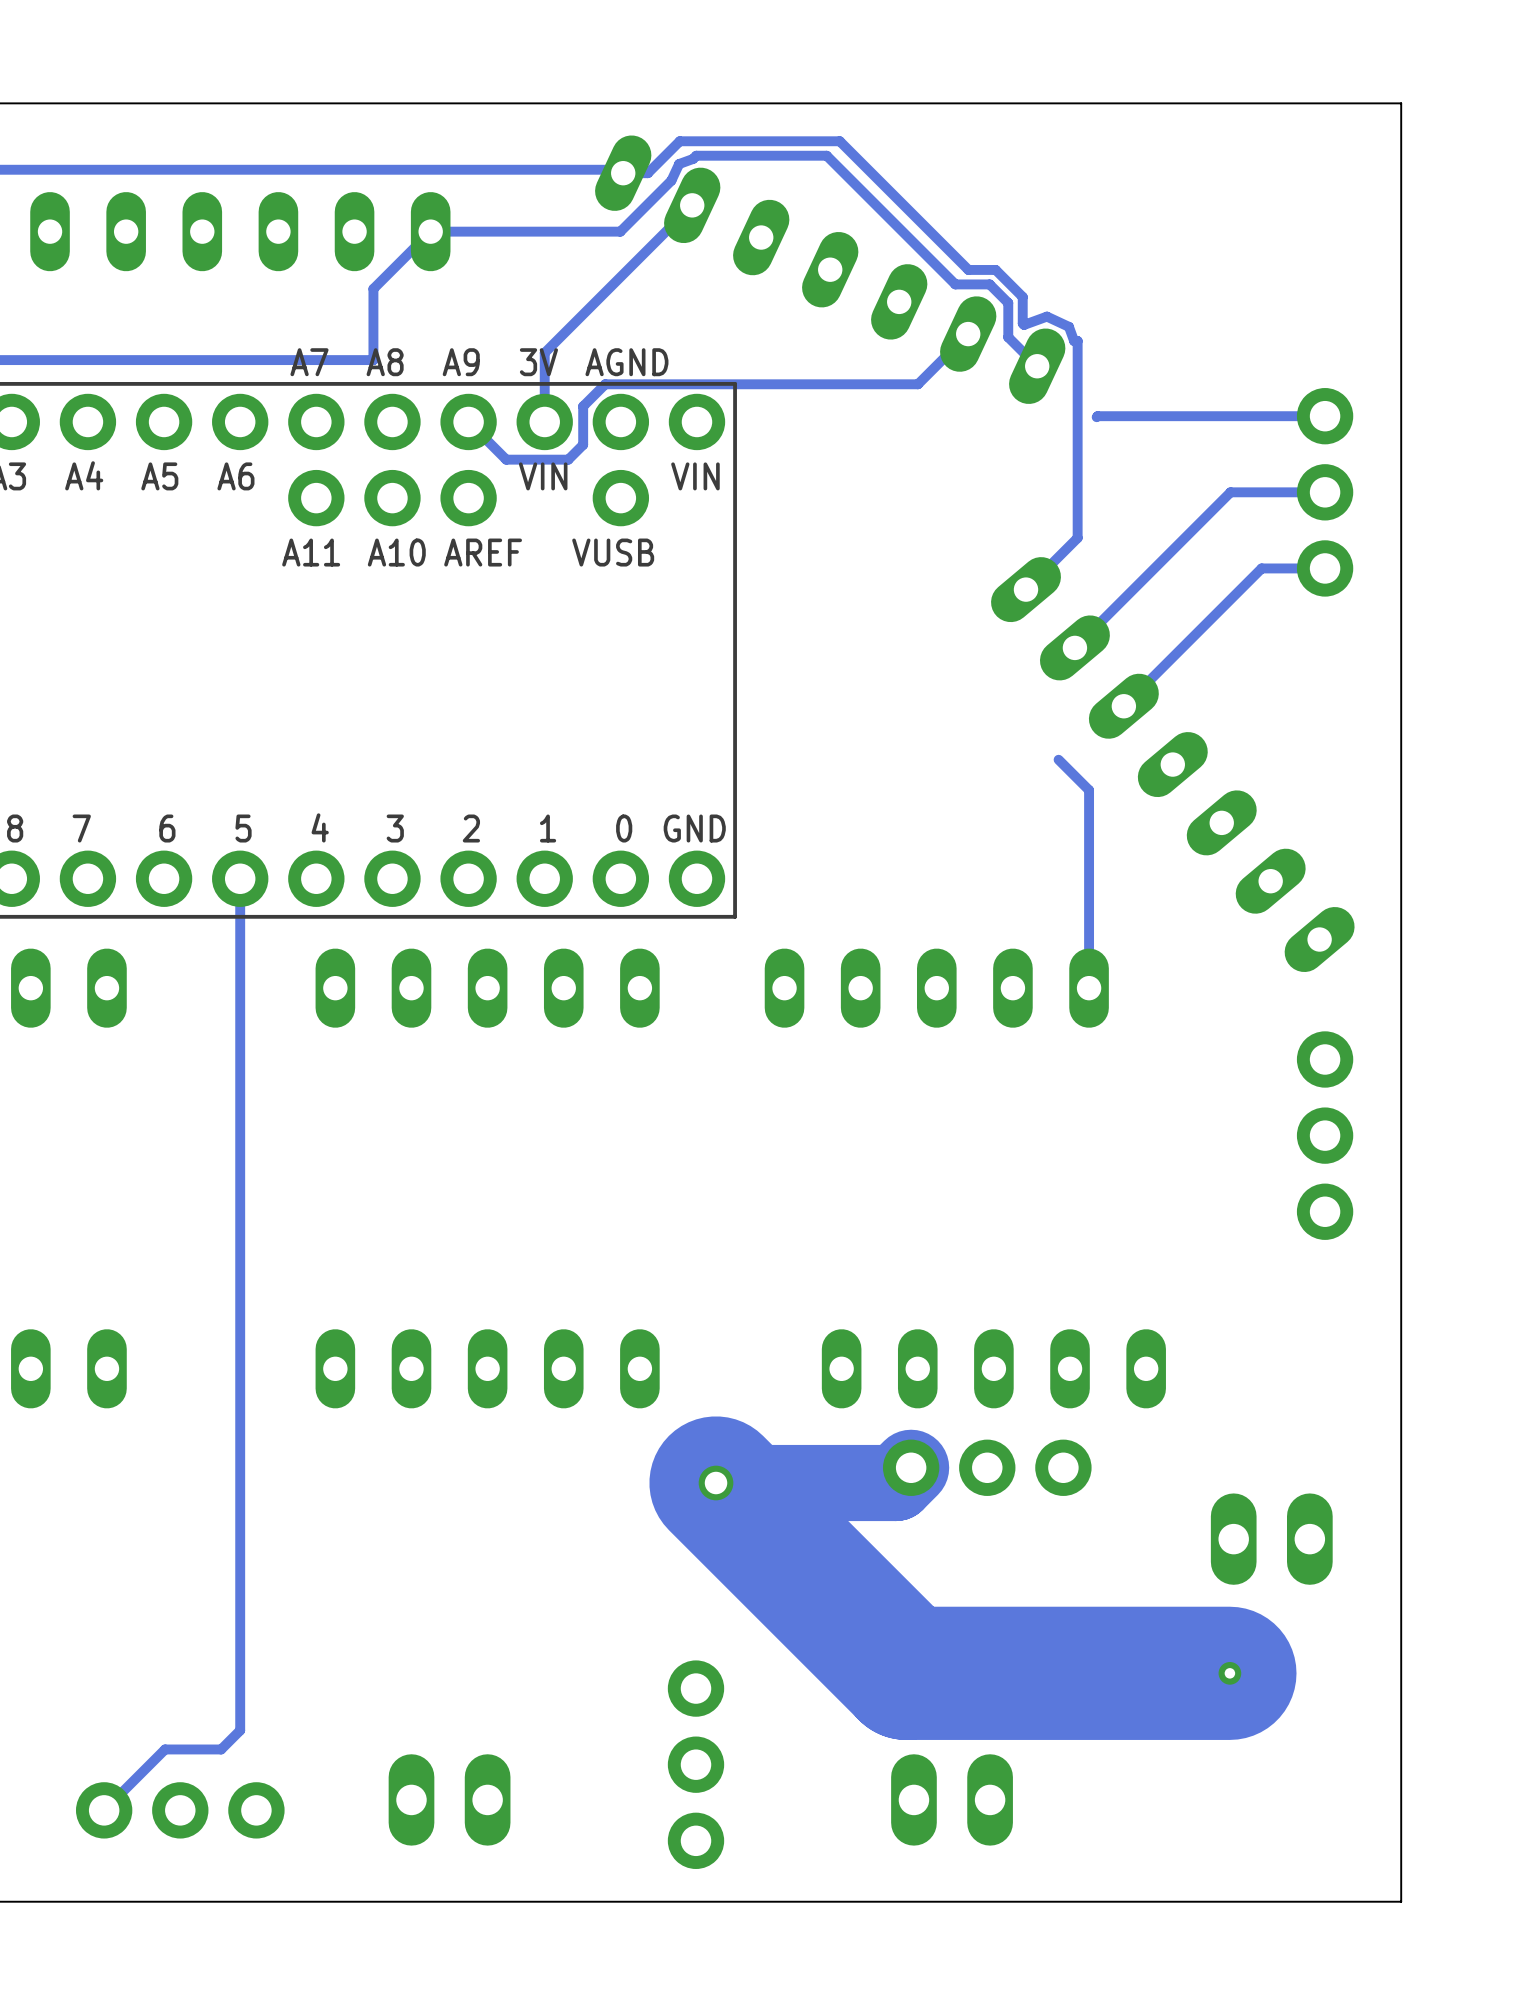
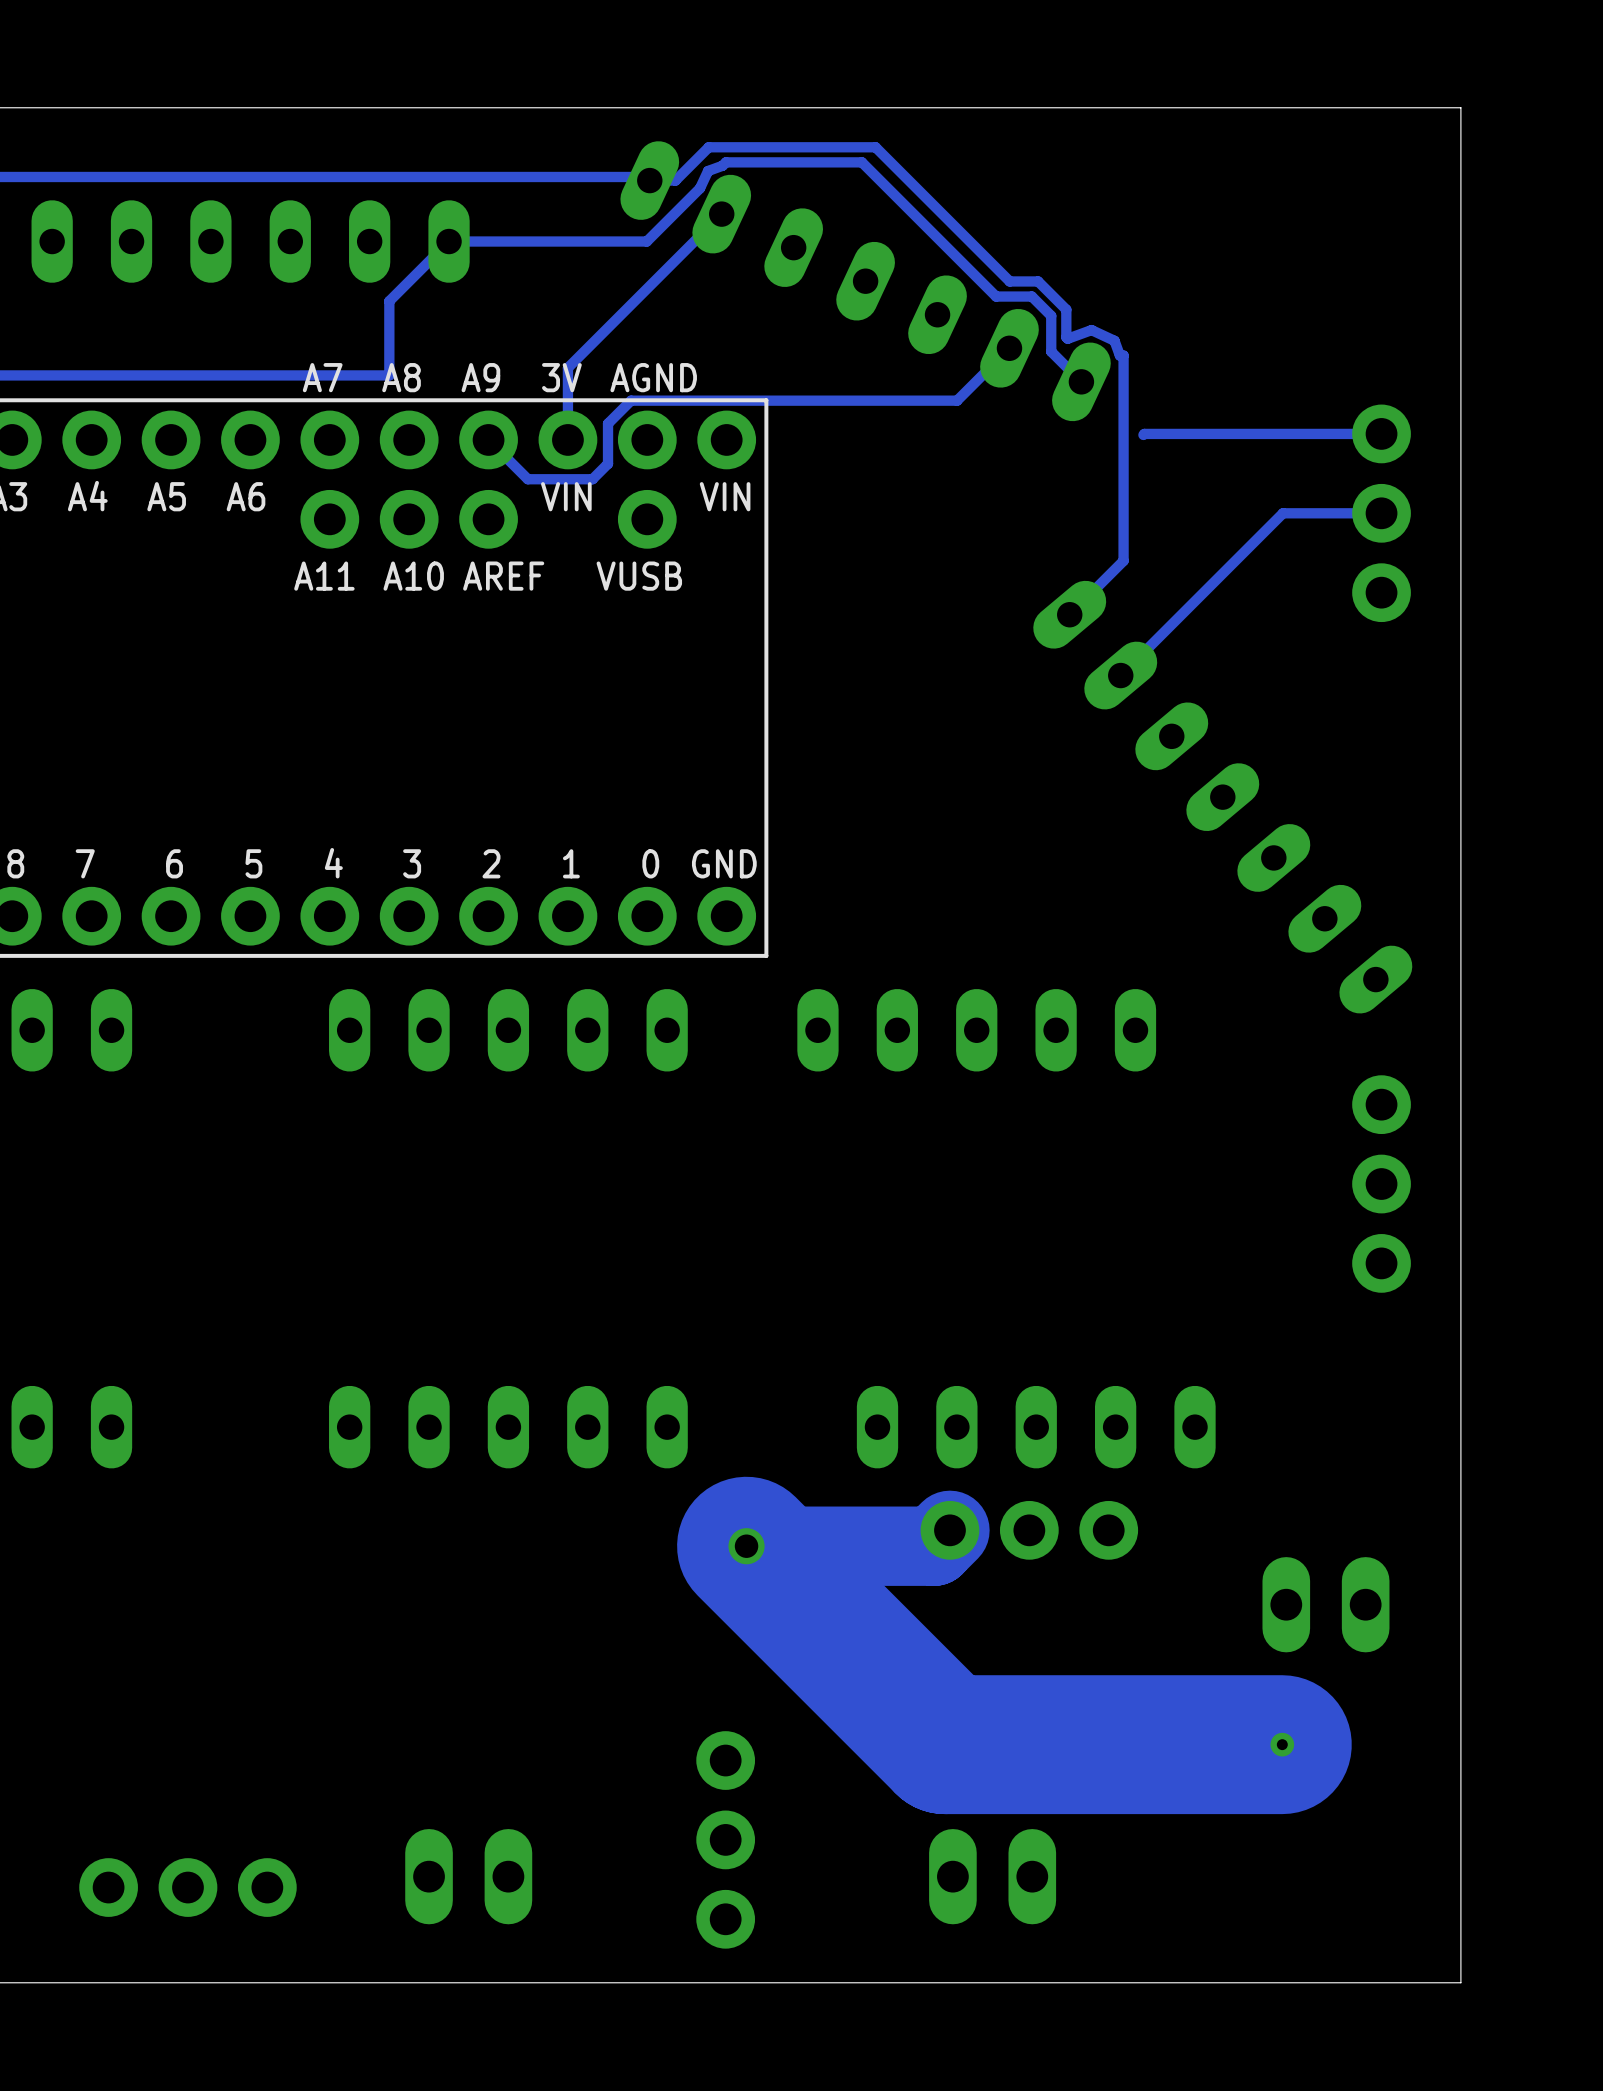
track: (1325, 568) (1261, 568) (1123, 706) -> none
track: (1058, 759) (1089, 790) (1089, 988) -> none
track: (240, 878) (240, 1730) (221, 1749) (165, 1749) (104, 1810) -> none

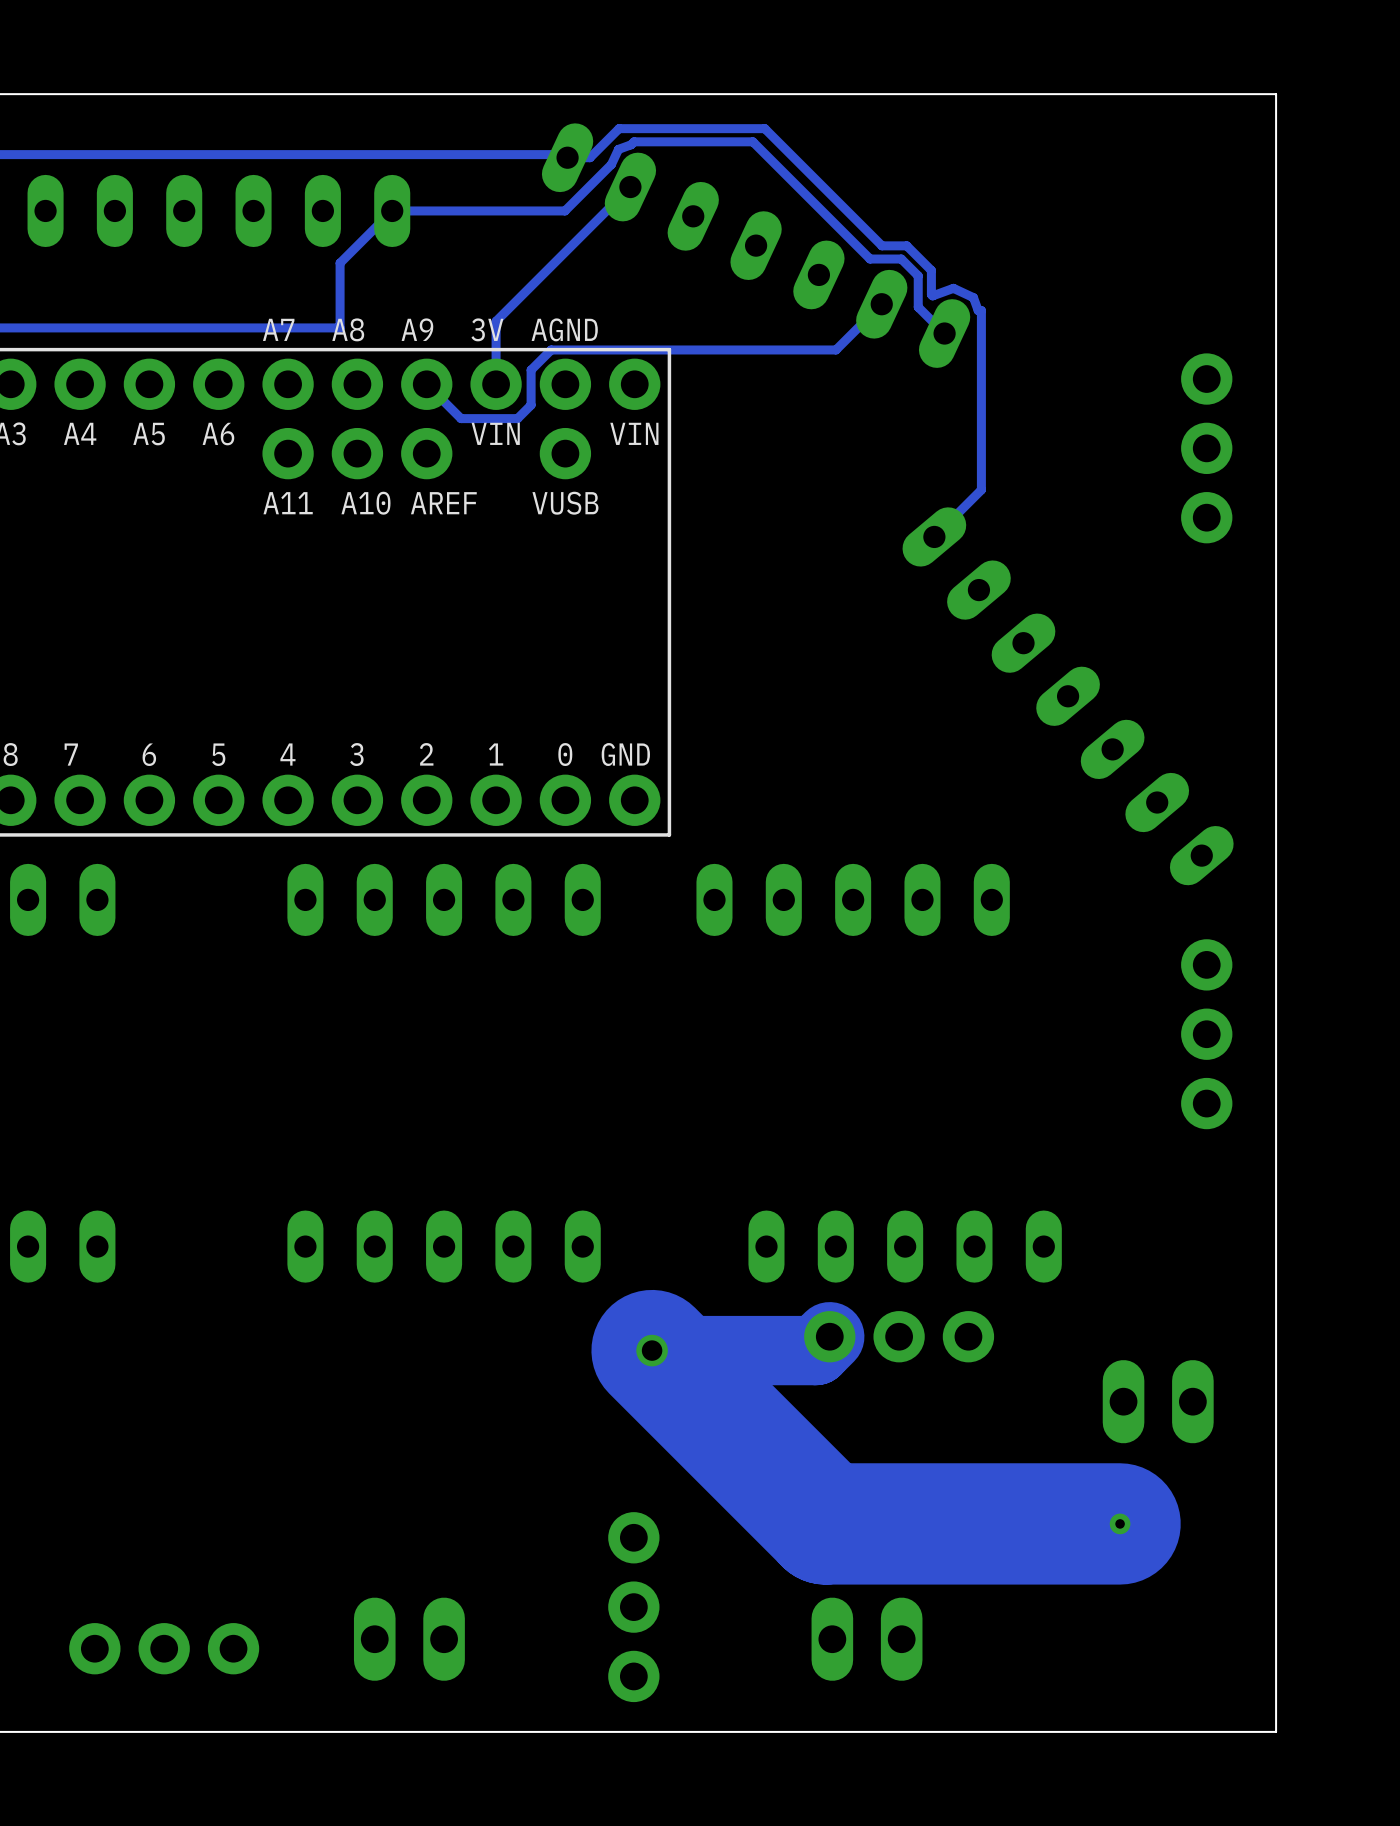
track: (1381, 433) (1143, 434) -> none
track: (1381, 513) (1282, 513) (1120, 675) -> none

